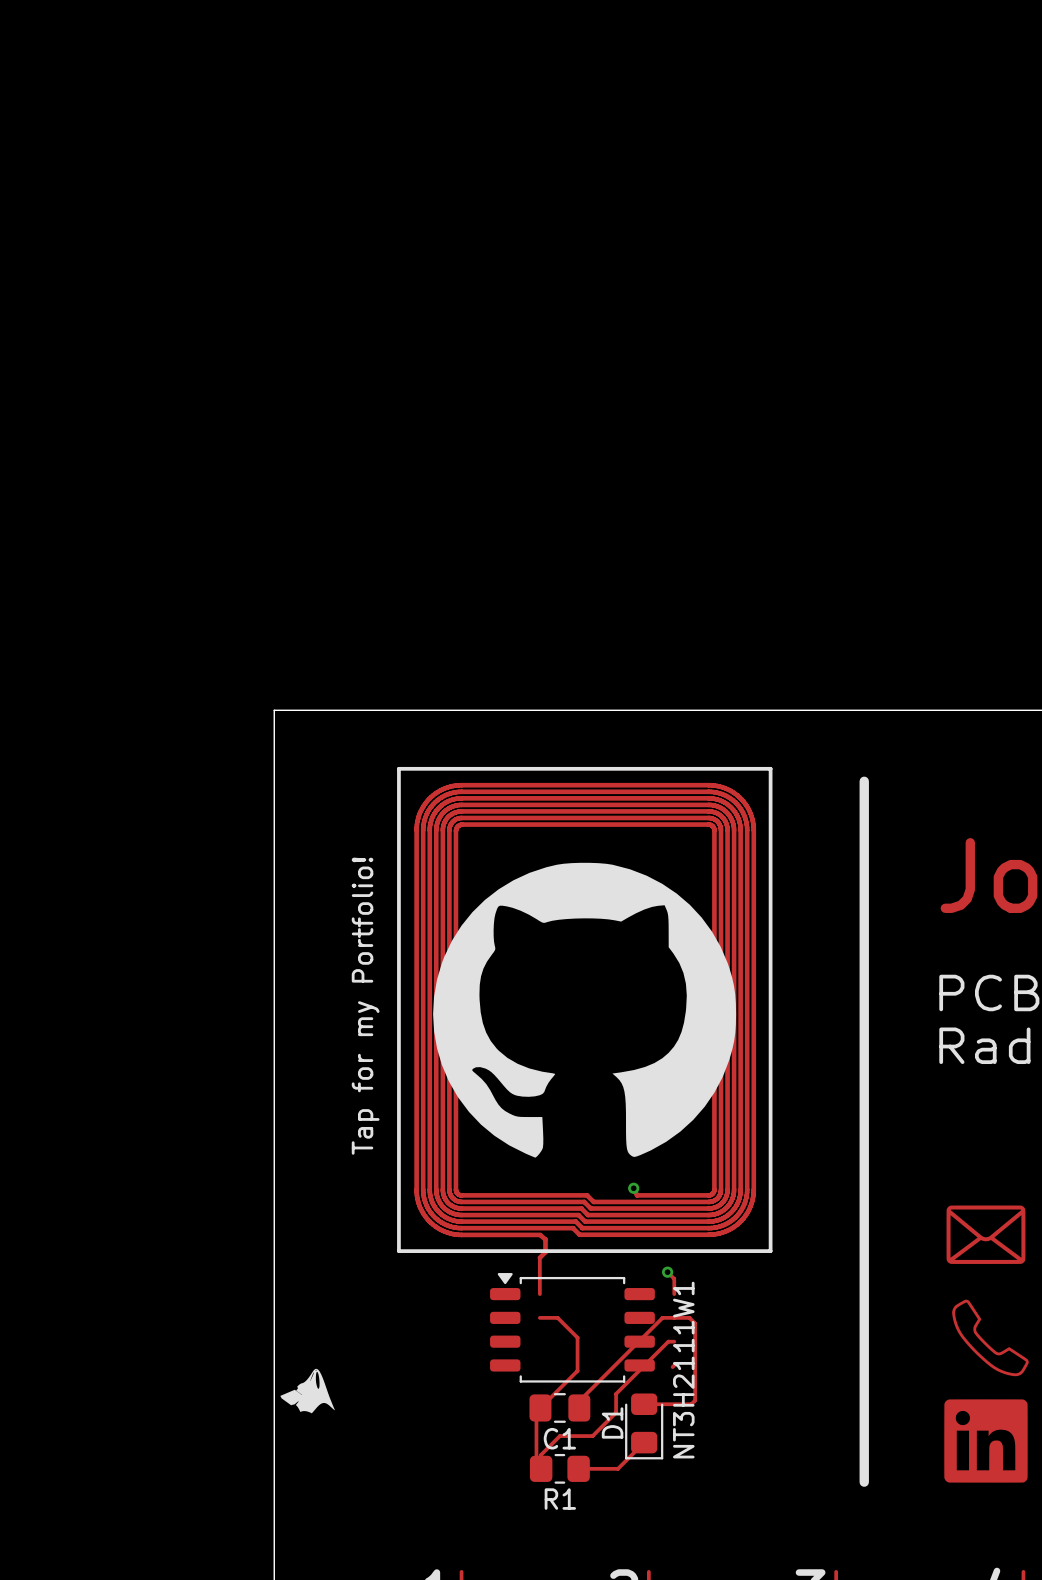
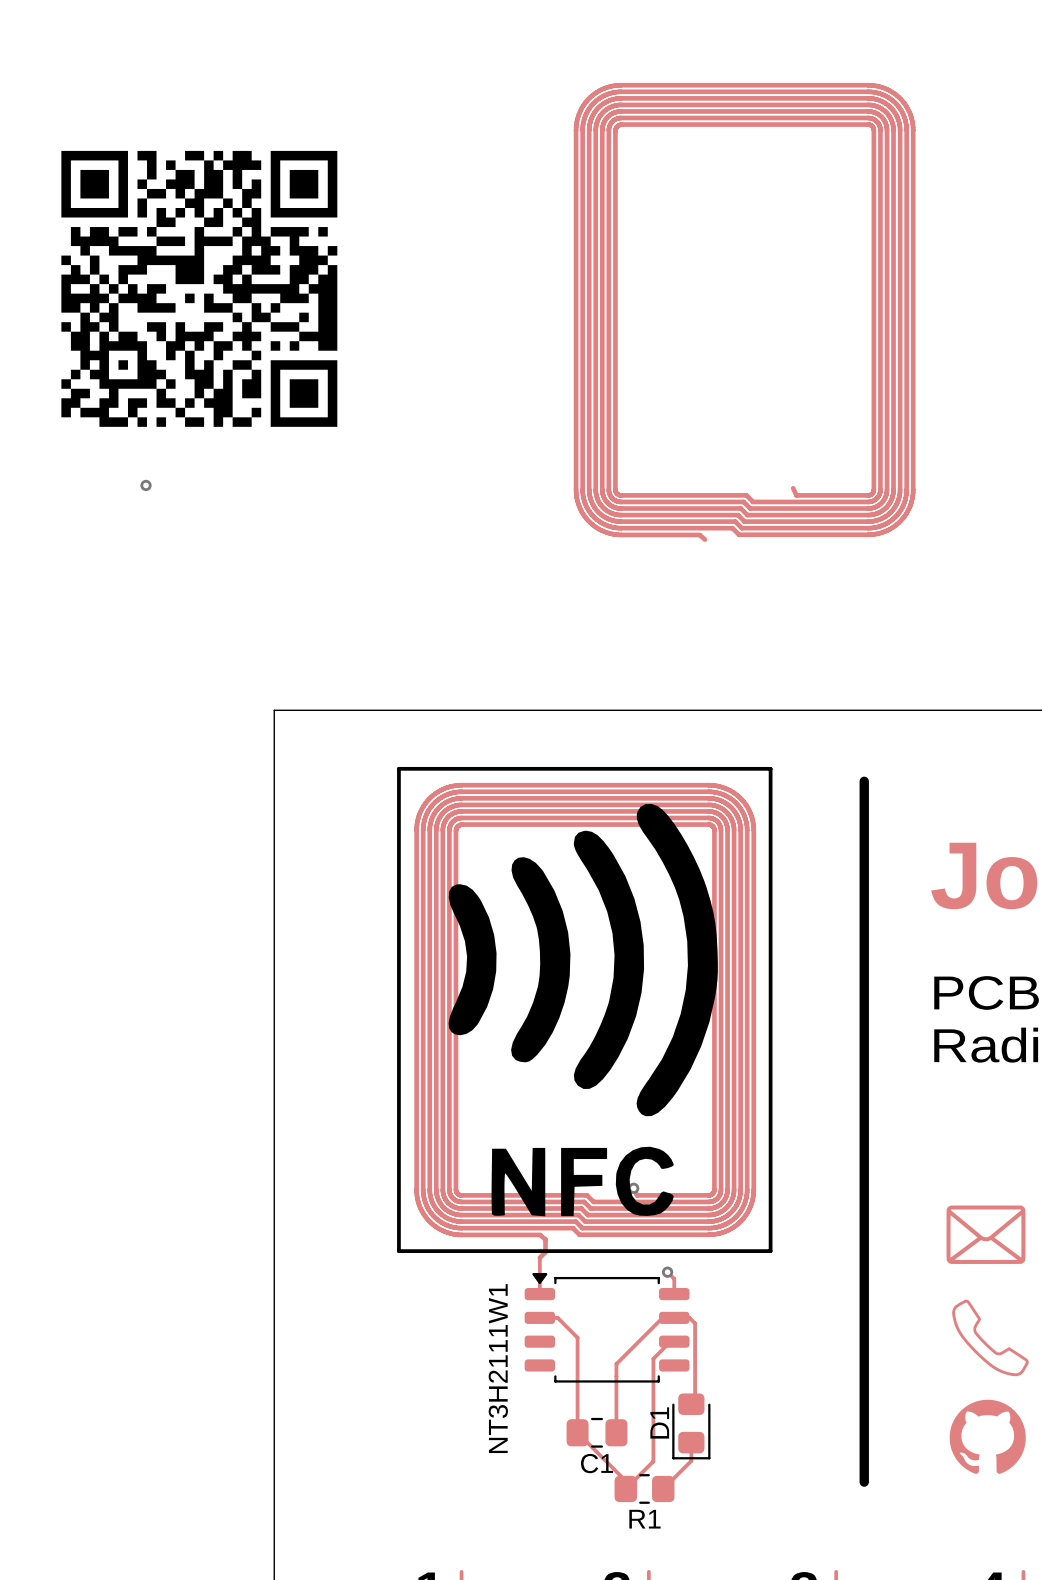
track: none -> (595, 130) (595, 489)
track: none -> (595, 130) (597, 120) (603, 111) (612, 106) (621, 104) (870, 105) (882, 109) (890, 118) (893, 130) (893, 491) (890, 501) (885, 508) (876, 513) (868, 515) (747, 515) (740, 508) (619, 508) (610, 505) (605, 500) (602, 489) (603, 124) (609, 115) (621, 111) (868, 111) (878, 114) (884, 121) (887, 130) (887, 489) (881, 503) (868, 508) (750, 508) (743, 501) (621, 501) (610, 496) (608, 489) (609, 127) (612, 121) (621, 118) (868, 118) (873, 119) (879, 124) (880, 489) (877, 497) (868, 501) (753, 501) (746, 495) (621, 495) (616, 492) (615, 130) (617, 126) (621, 124) (868, 124) (873, 127) (873, 490) (868, 495) (796, 495) (793, 488)
drawing: none -> [61, 150, 338, 427]
via: none -> (146, 485)
track: none -> (595, 489) (597, 497) (602, 506) (608, 512) (618, 514) (738, 515) (744, 521) (868, 521) (882, 518) (894, 507) (900, 489) (900, 127) (896, 116) (891, 108) (882, 101) (870, 98) (618, 98) (605, 102) (594, 112) (589, 130) (589, 492) (592, 503) (597, 511) (607, 518) (618, 521) (735, 521) (741, 528) (868, 528) (885, 523) (899, 511) (905, 500) (906, 489) (906, 127) (902, 112) (894, 102) (883, 94) (870, 91) (618, 91) (601, 97) (589, 108) (584, 119) (582, 130) (582, 492) (586, 507) (594, 517) (605, 524) (618, 528) (732, 528) (739, 534) (871, 534) (889, 529) (904, 516) (911, 503) (913, 489) (913, 127) (910, 113) (904, 103) (894, 93) (884, 88) (868, 85) (618, 85) (604, 88) (594, 93) (584, 103) (579, 113) (576, 130) (577, 501) (588, 520) (596, 527) (609, 533) (699, 534)
track: none -> (700, 535) (704, 539)
drawing shape: [433, 862, 737, 1158] -> [448, 804, 718, 1217]
text: Tap for my Portfolio! (365, 1006) -> none
NT3H2111W1 position: (572, 1327) -> (607, 1327)
track: (670, 1341) (616, 1393) (616, 1412) (592, 1436) (559, 1436) (541, 1454) (541, 1468) (536, 1464) (536, 1411) (577, 1370) -> (670, 1341) (653, 1358) (653, 1461) (625, 1488) (625, 1481) (577, 1432) (577, 1370)
track: (616, 1364) (579, 1401) (579, 1407) -> (616, 1364) (616, 1432)
drawing: [280, 1368, 336, 1414] -> none
NT3H2111W1 name position: NT3H2111W1 (683, 1370) -> NT3H2111W1 (498, 1368)
drawing shape: [944, 1399, 1028, 1483] -> [949, 1399, 1026, 1474]
track: (644, 1404) (691, 1404) -> none
C1 position: (559, 1407) -> (597, 1432)
D1 position: (644, 1426) -> (691, 1426)
track: (644, 1442) (617, 1468) (578, 1468) -> none
track: none -> (691, 1442) (691, 1460) (663, 1488)
R1 position: (559, 1468) -> (644, 1488)

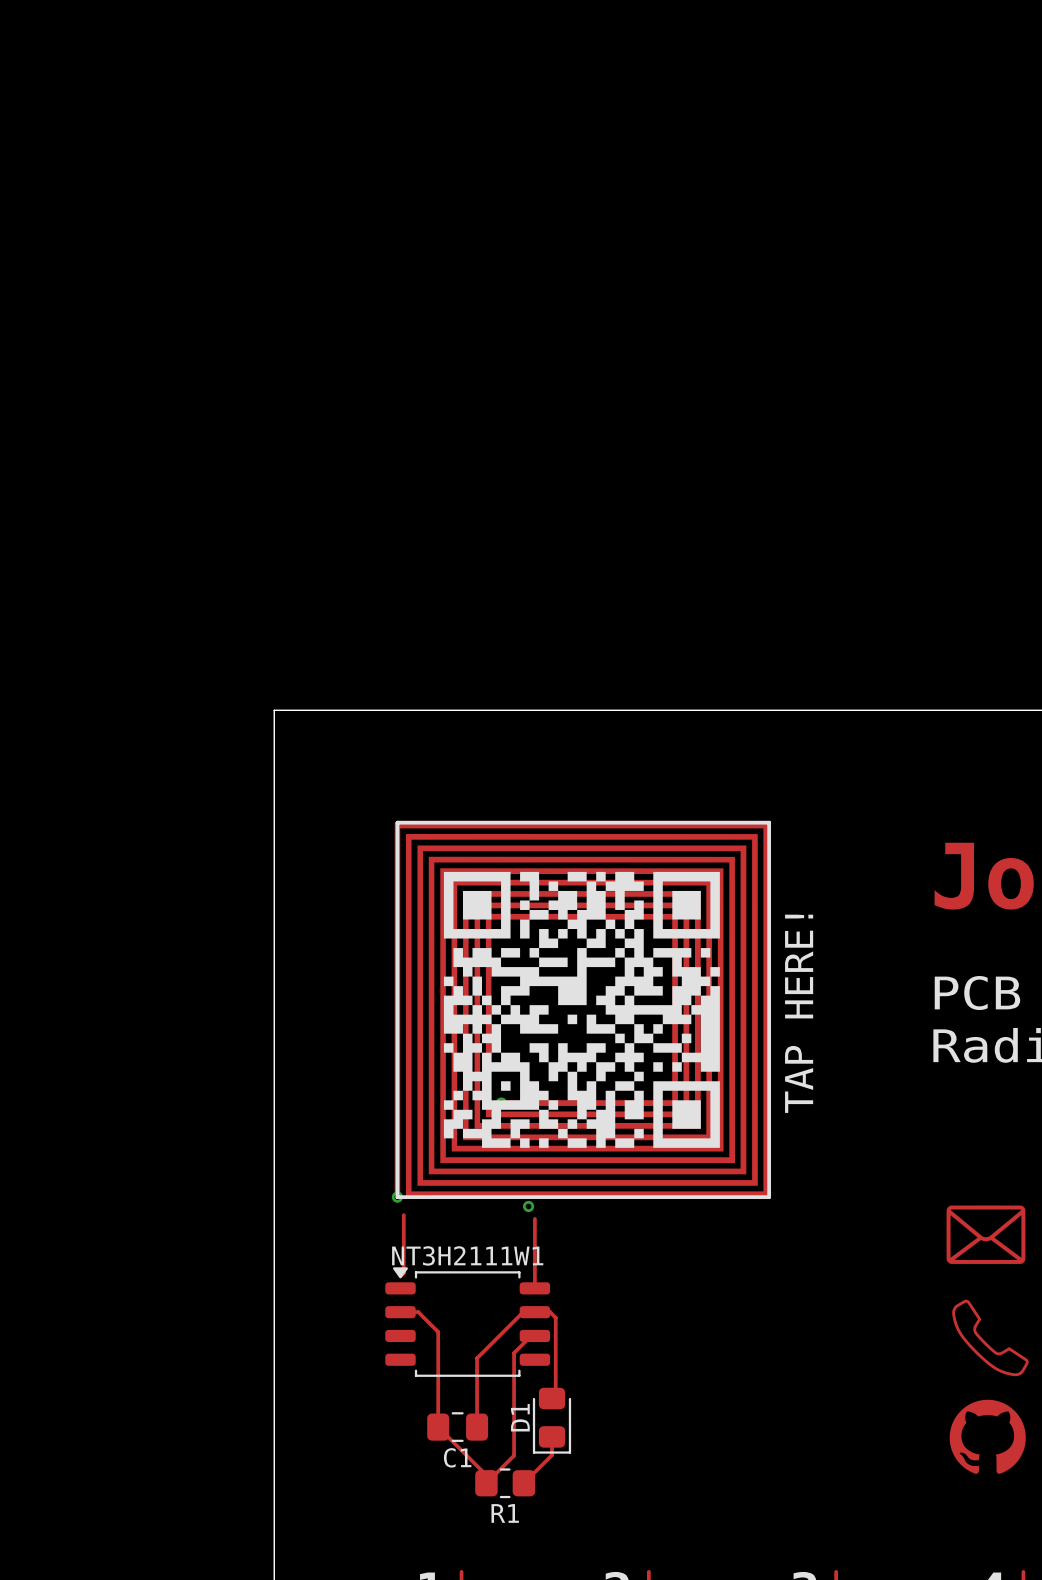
track: (595, 130) (595, 489) -> none
track: (595, 130) (597, 120) (603, 111) (612, 106) (621, 104) (870, 105) (882, 109) (890, 118) (893, 130) (893, 491) (890, 501) (885, 508) (876, 513) (868, 515) (747, 515) (740, 508) (619, 508) (610, 505) (605, 500) (602, 489) (603, 124) (609, 115) (621, 111) (868, 111) (878, 114) (884, 121) (887, 130) (887, 489) (881, 503) (868, 508) (750, 508) (743, 501) (621, 501) (610, 496) (608, 489) (609, 127) (612, 121) (621, 118) (868, 118) (873, 119) (879, 124) (880, 489) (877, 497) (868, 501) (753, 501) (746, 495) (621, 495) (616, 492) (615, 130) (617, 126) (621, 124) (868, 124) (873, 127) (873, 490) (868, 495) (796, 495) (793, 488) -> none
drawing: [61, 150, 338, 427] -> none
via: (146, 485) -> none
track: (595, 489) (597, 497) (602, 506) (608, 512) (618, 514) (738, 515) (744, 521) (868, 521) (882, 518) (894, 507) (900, 489) (900, 127) (896, 116) (891, 108) (882, 101) (870, 98) (618, 98) (605, 102) (594, 112) (589, 130) (589, 492) (592, 503) (597, 511) (607, 518) (618, 521) (735, 521) (741, 528) (868, 528) (885, 523) (899, 511) (905, 500) (906, 489) (906, 127) (902, 112) (894, 102) (883, 94) (870, 91) (618, 91) (601, 97) (589, 108) (584, 119) (582, 130) (582, 492) (586, 507) (594, 517) (605, 524) (618, 528) (732, 528) (739, 534) (871, 534) (889, 529) (904, 516) (911, 503) (913, 489) (913, 127) (910, 113) (904, 103) (894, 93) (884, 88) (868, 85) (618, 85) (604, 88) (594, 93) (584, 103) (579, 113) (576, 130) (577, 501) (588, 520) (596, 527) (609, 533) (699, 534) -> none
track: (700, 535) (704, 539) -> none
line: (398, 768) (770, 768) (770, 1251) (398, 1251) (398, 768) -> (397, 822) (397, 1197) (769, 1197) (769, 822) (397, 822)
line: (864, 781) (864, 1482) -> none
drawing shape: [448, 804, 718, 1217] -> [443, 871, 720, 1148]
TAP HERE!: none -> (580, 1012)
track: (633, 1188) (637, 1195) (708, 1195) (714, 1190) (713, 827) (708, 824) (462, 824) (457, 826) (456, 830) (456, 1192) (461, 1195) (587, 1195) (593, 1201) (708, 1201) (716, 1198) (720, 1189) (719, 824) (714, 819) (708, 817) (461, 817) (453, 821) (449, 827) (449, 1189) (451, 1196) (461, 1201) (584, 1201) (590, 1208) (708, 1208) (722, 1203) (727, 1189) (727, 830) (725, 821) (719, 814) (708, 811) (461, 811) (449, 815) (443, 824) (442, 1189) (445, 1200) (451, 1205) (459, 1208) (581, 1208) (587, 1215) (708, 1215) (718, 1212) (725, 1208) (731, 1201) (733, 1191) (734, 830) (731, 818) (722, 808) (710, 805) (461, 804) (446, 810) (437, 823) (436, 1189) (440, 1203) (447, 1210) (459, 1214) (578, 1215) (585, 1221) (708, 1221) (720, 1219) (730, 1213) (737, 1203) (740, 1192) (740, 830) (736, 814) (726, 803) (711, 798) (461, 798) (443, 803) (435, 812) (431, 820) (429, 1189) (435, 1207) (445, 1217) (459, 1221) (575, 1221) (582, 1228) (708, 1228) (724, 1224) (735, 1217) (742, 1207) (747, 1192) (747, 830) (741, 810) (728, 797) (711, 791) (461, 791) (448, 794) (437, 800) (428, 810) (424, 819) (423, 1189) (424, 1200) (430, 1211) (441, 1222) (458, 1228) (573, 1228) (579, 1234) (708, 1234) (725, 1231) (739, 1222) (748, 1211) (753, 1195) (753, 830) (749, 811) (735, 793) (725, 788) (711, 785) (461, 785) (442, 789) (425, 803) (419, 813) (416, 827) (417, 1198) (420, 1208) (428, 1220) (447, 1232) (461, 1234) (540, 1234) -> none
via: (633, 1188) -> none
via: none -> (528, 1206)
track: none -> (403, 1215) (403, 1272) (400, 1276)
track: none -> (534, 1218) (534, 1288)
track: (540, 1235) (545, 1239) (545, 1252) (539, 1257) (539, 1294) -> none
track: (667, 1272) (674, 1278) (674, 1294) -> none
via: (667, 1272) -> none
track: (539, 1317) (557, 1317) (577, 1337) (577, 1432) (625, 1481) (625, 1488) (653, 1461) (653, 1358) (670, 1341) (674, 1341) -> (400, 1312) (418, 1312) (438, 1332) (438, 1427) (486, 1475) (486, 1483) (514, 1455) (514, 1353) (531, 1335) (534, 1335)
NT3H2111W1 position: (607, 1327) -> (467, 1322)
NT3H2111W1 name rotation: 0° (498, 1368) -> 90° clockwise (467, 1255)
track: (691, 1404) (695, 1400) (695, 1323) (689, 1317) (662, 1317) (616, 1364) (616, 1432) -> (551, 1398) (555, 1394) (555, 1317) (550, 1312) (523, 1312) (477, 1358) (477, 1427)
D1 position: (691, 1426) -> (551, 1420)
C1 position: (597, 1432) -> (457, 1427)
track: (691, 1442) (691, 1460) (663, 1488) -> (551, 1436) (551, 1455) (523, 1483)
R1 position: (644, 1488) -> (505, 1483)

